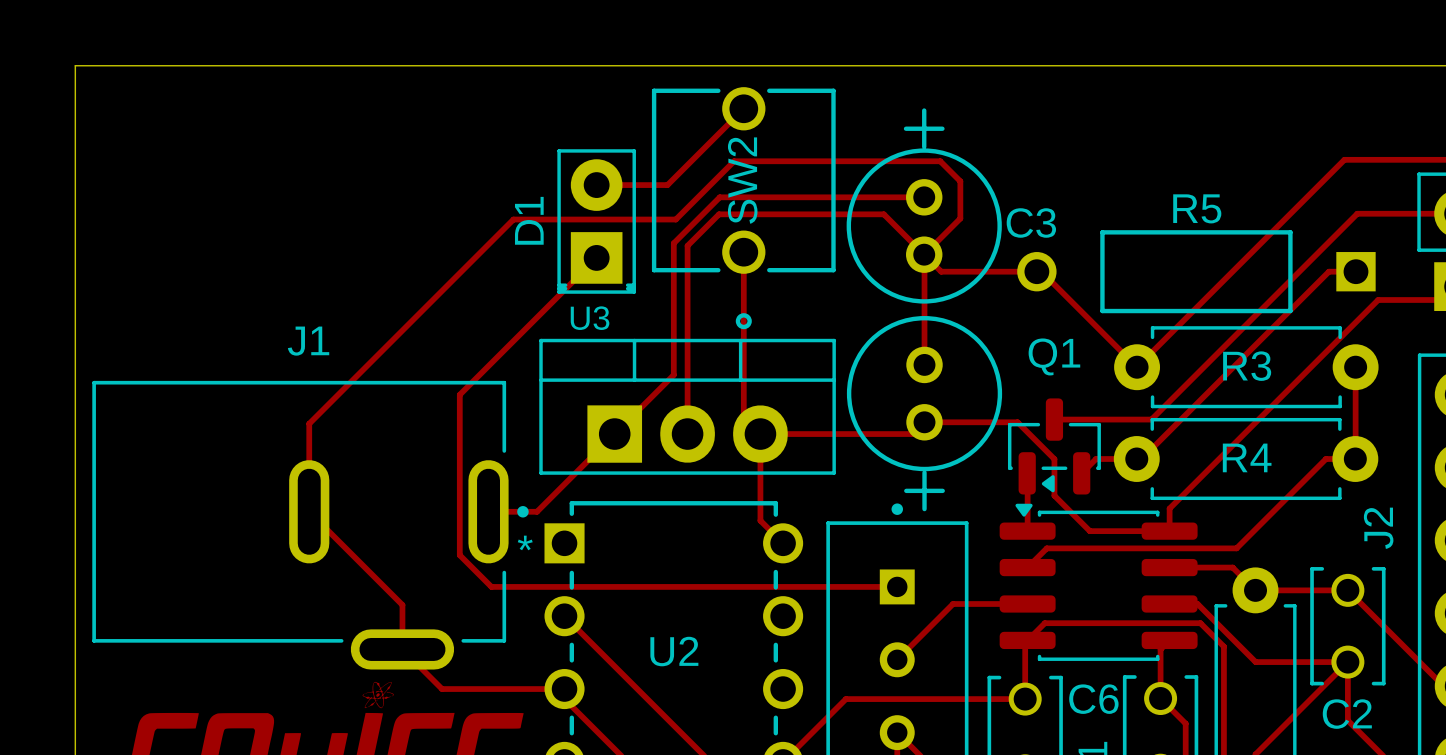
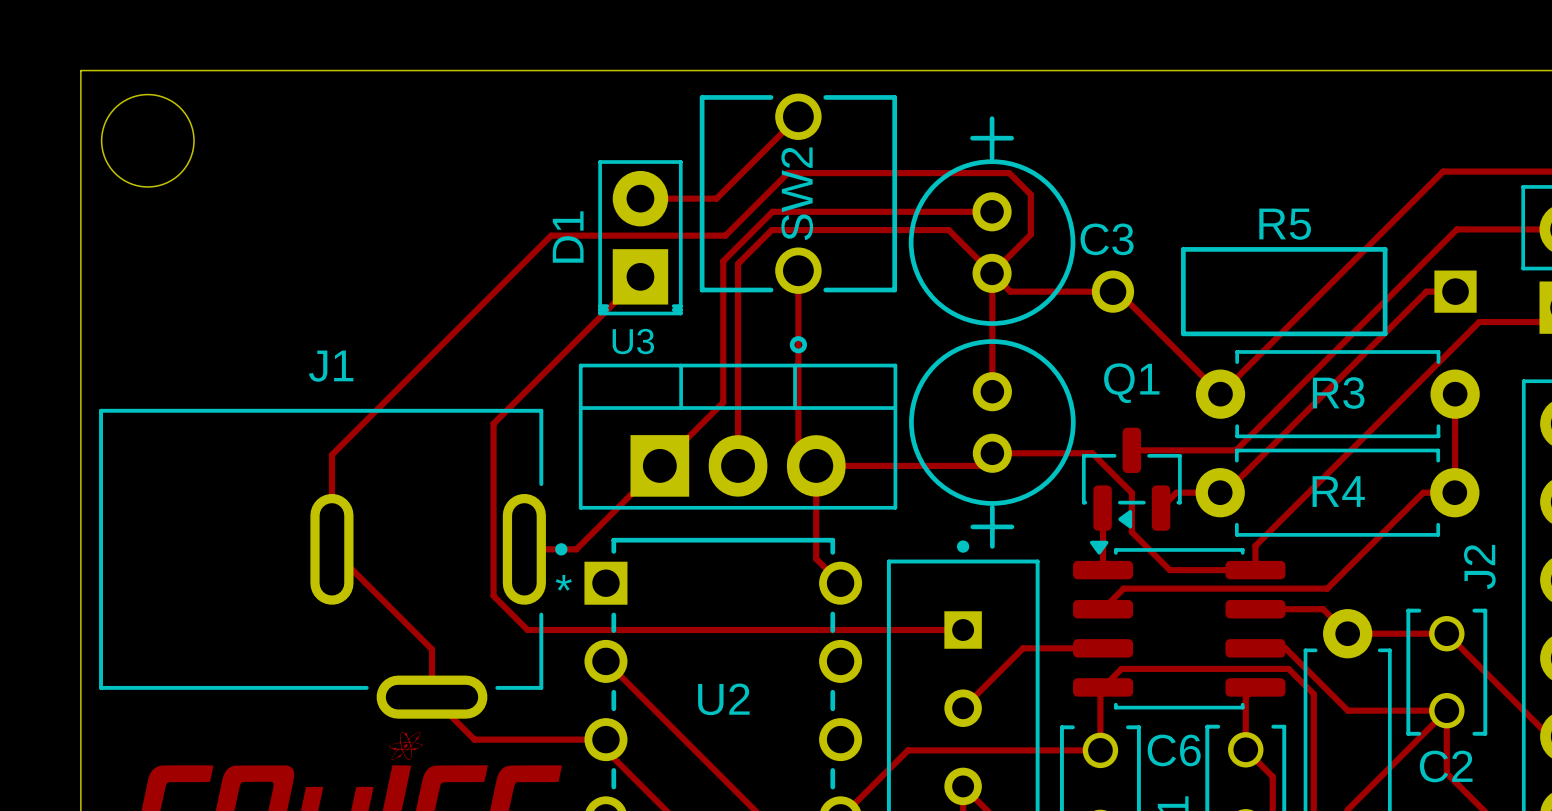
round board edge: none -> [100, 93, 195, 188]

